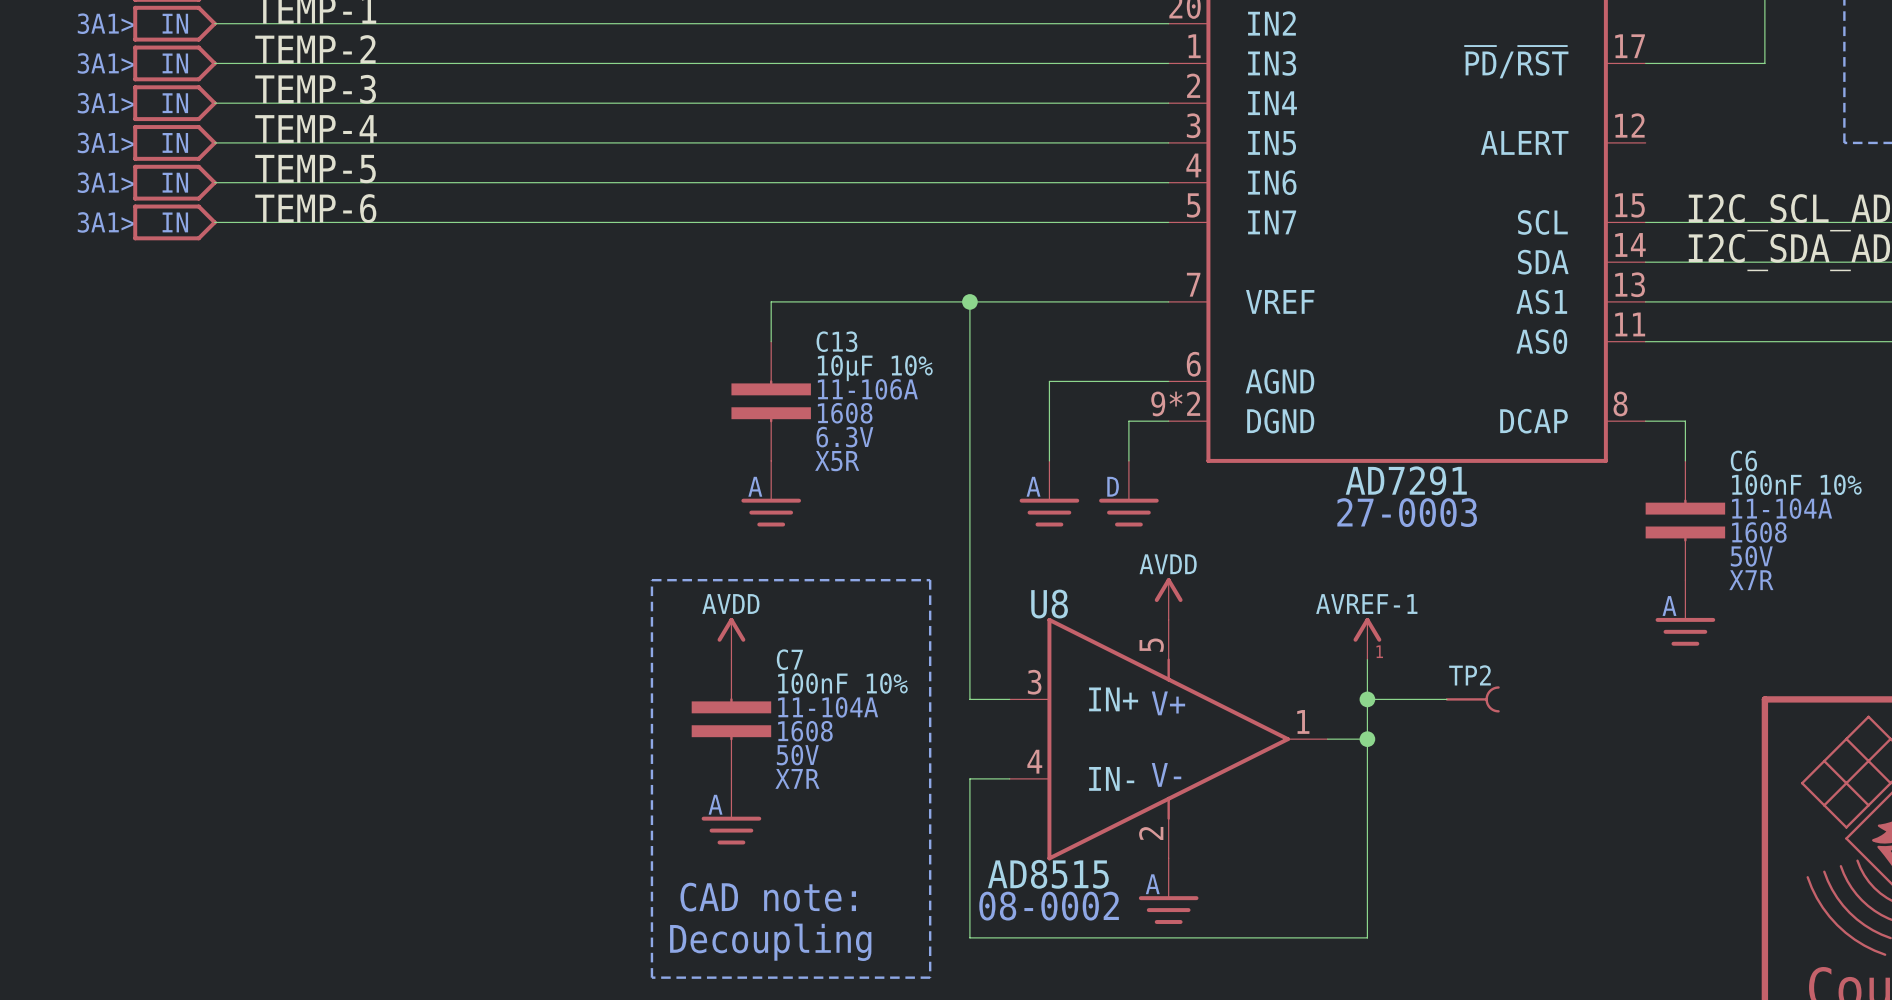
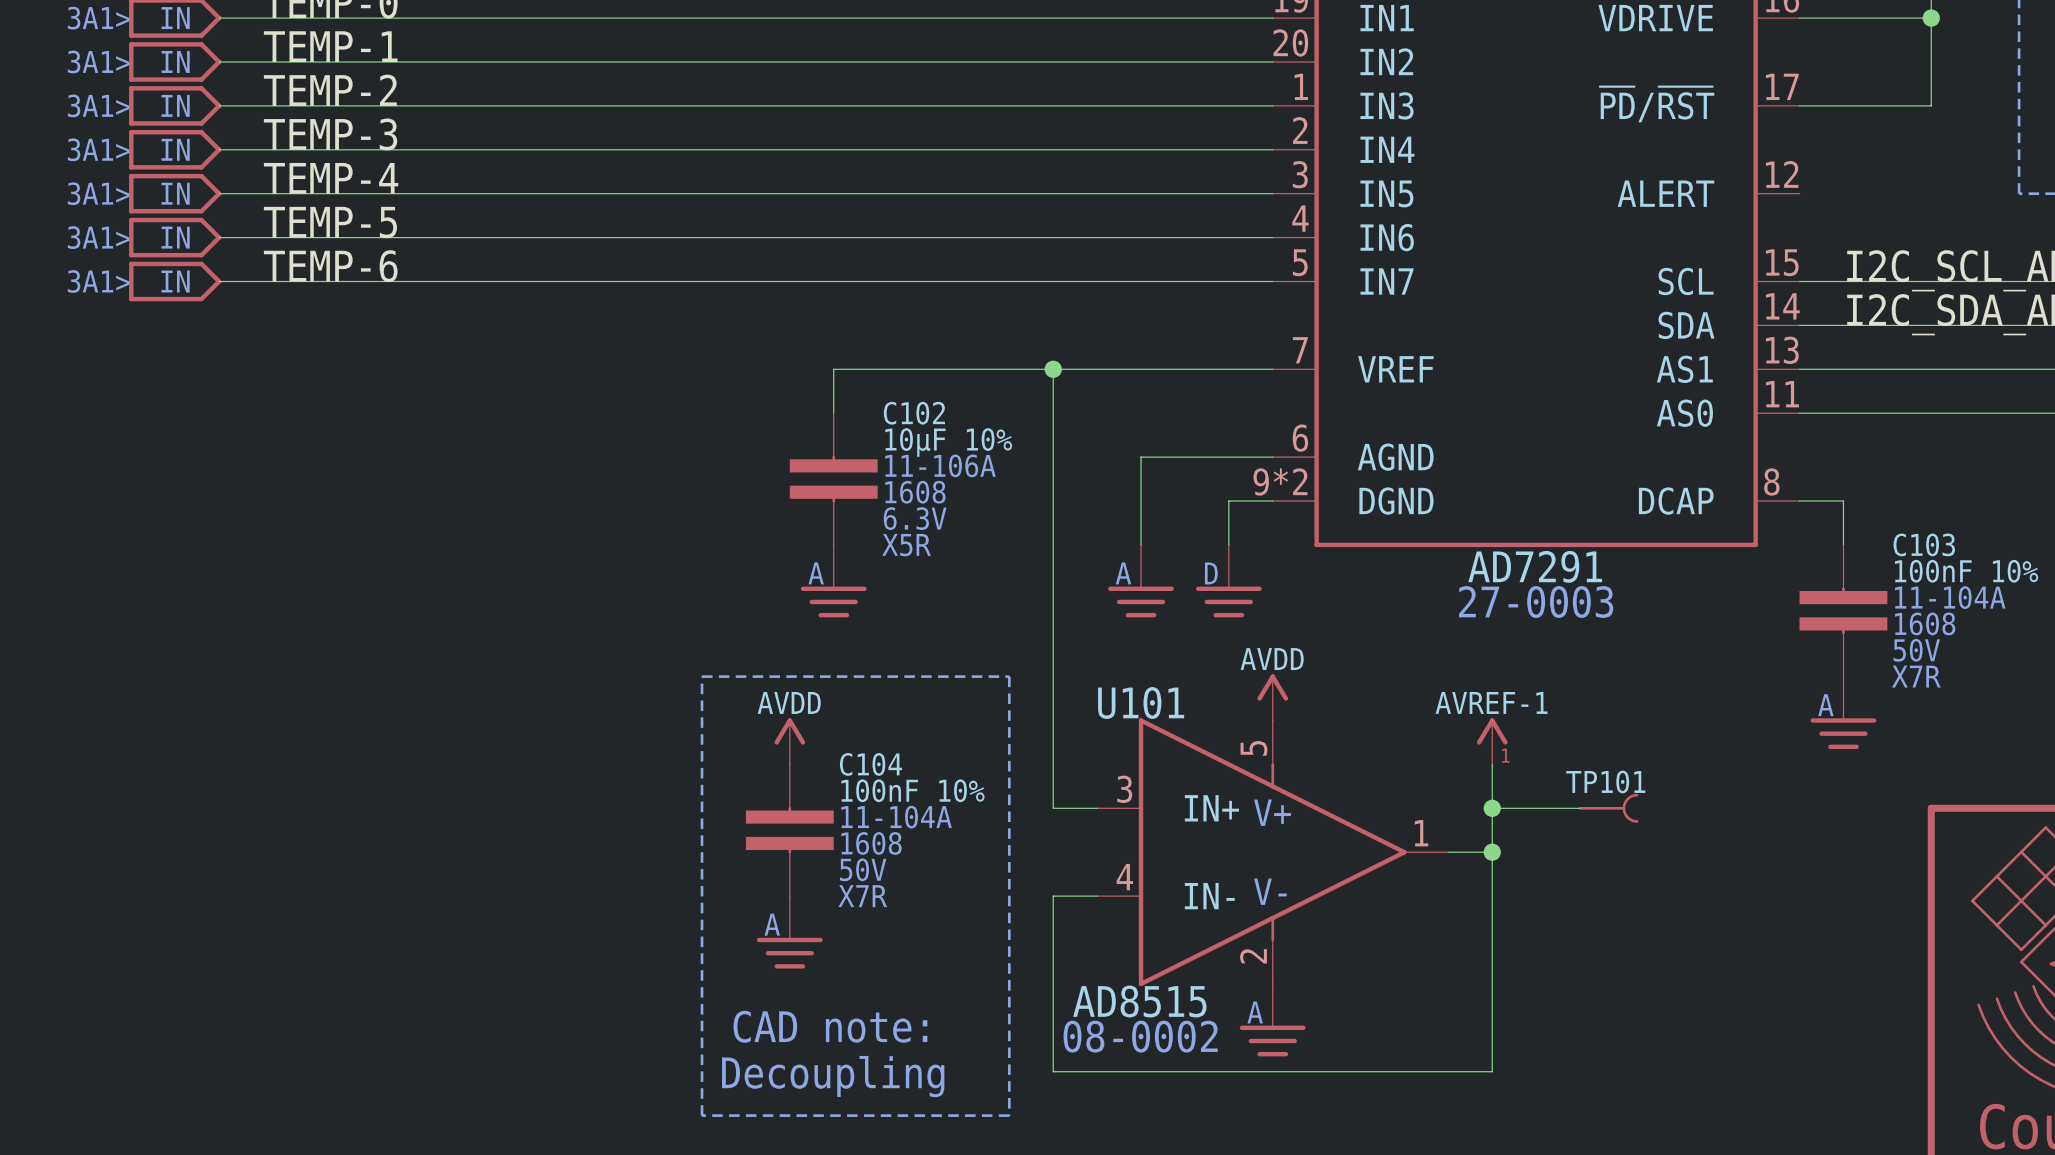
C13 name: C13 (836, 341) -> C102 (914, 413)
C6 name: C6 (1743, 460) -> C103 (1924, 544)
U8 name: U8 (1049, 604) -> U101 (1141, 702)
C7 name: C7 (789, 659) -> C104 (871, 764)
TP2 name: TP2 (1469, 675) -> TP101 (1605, 781)

